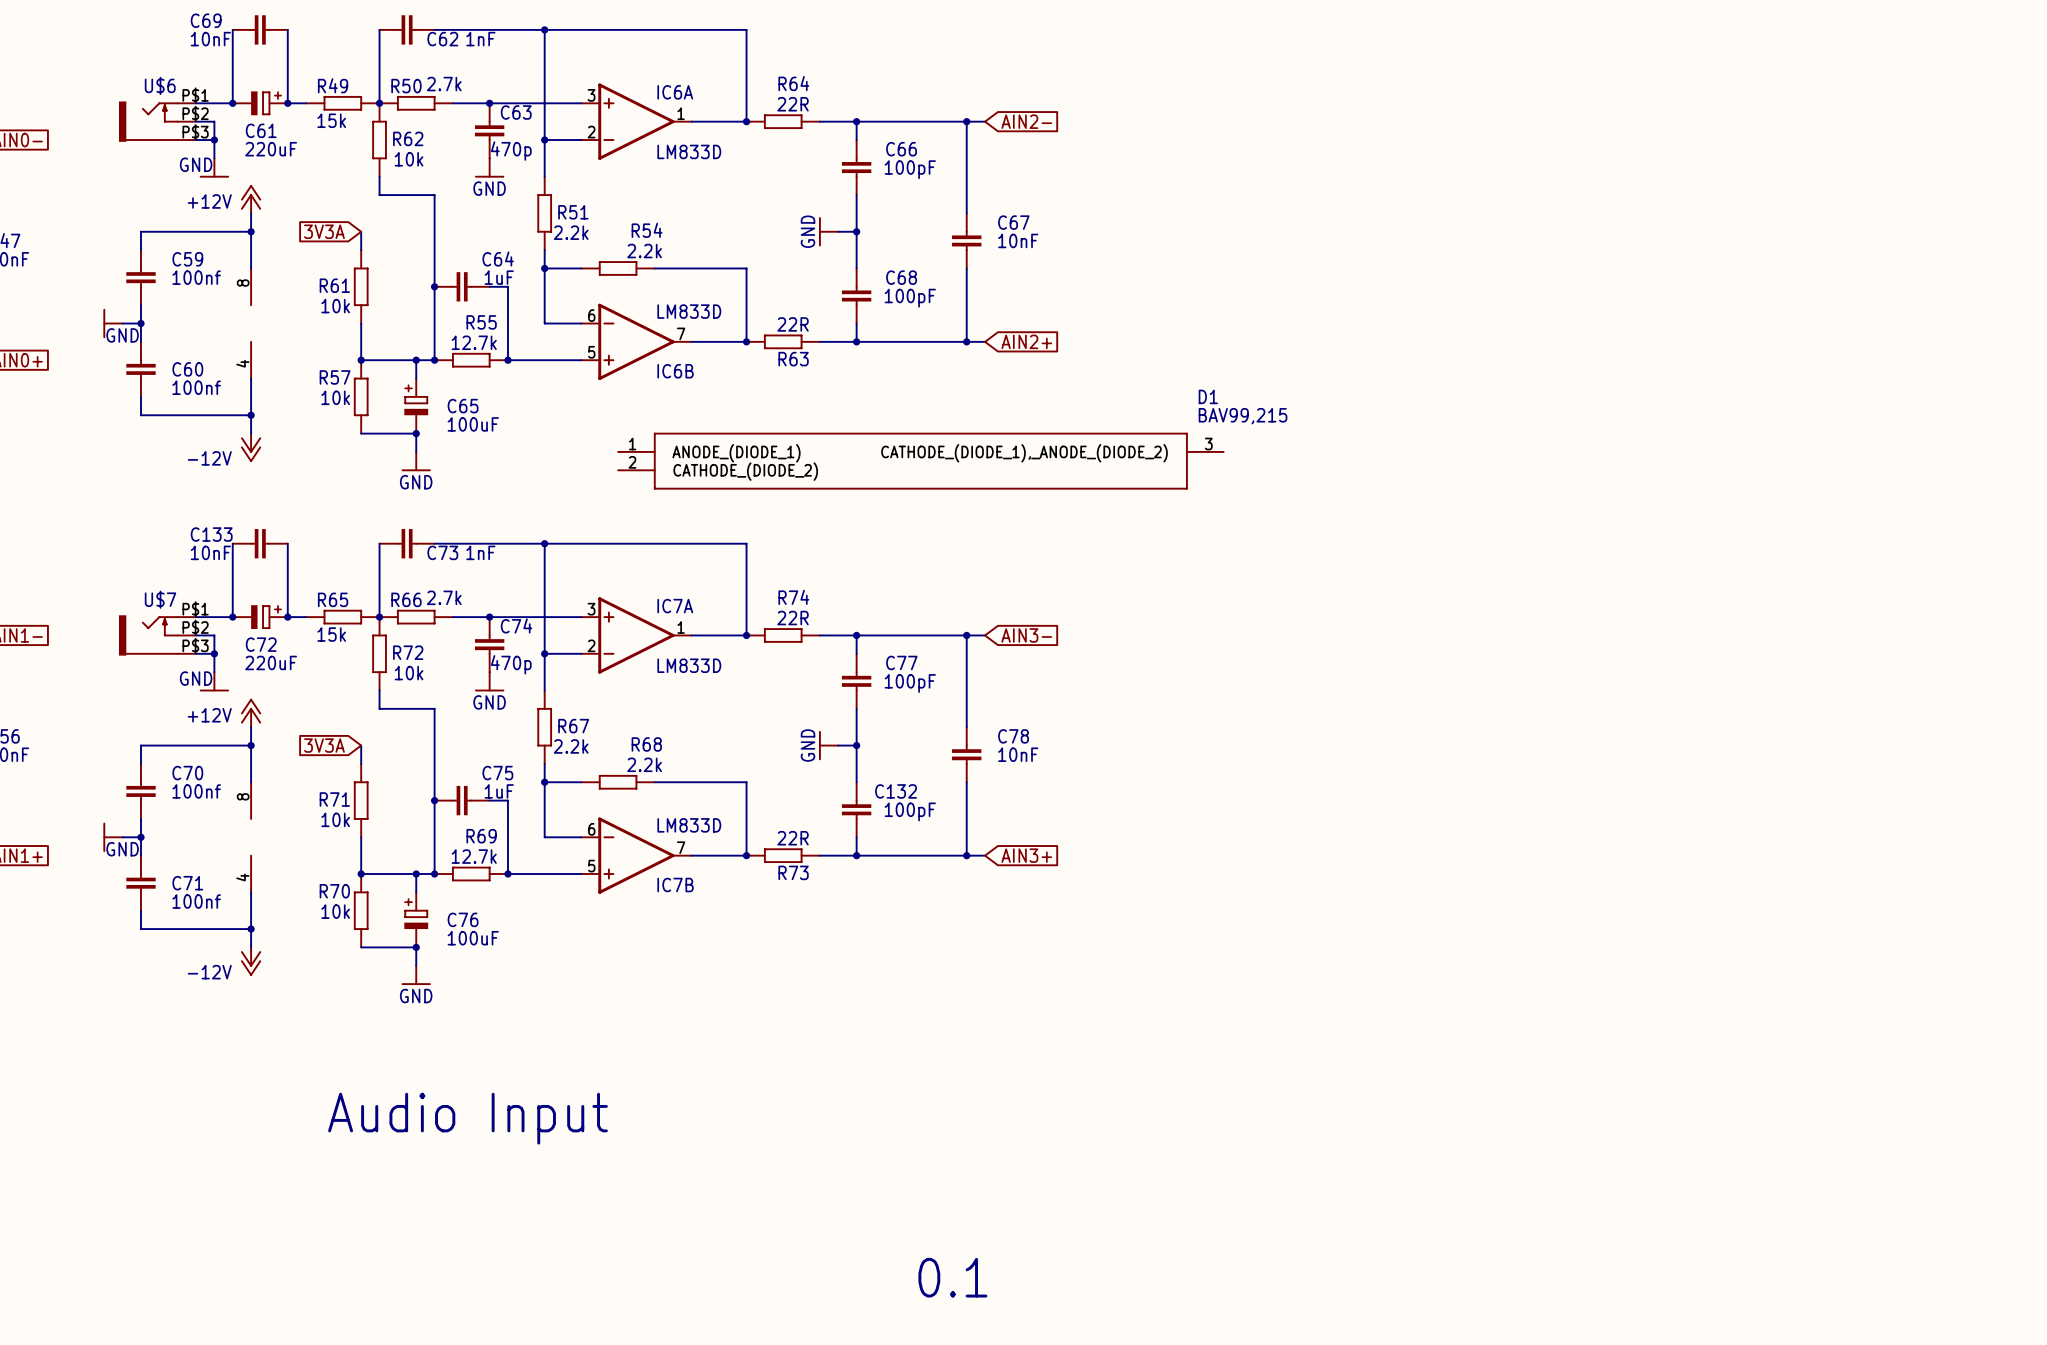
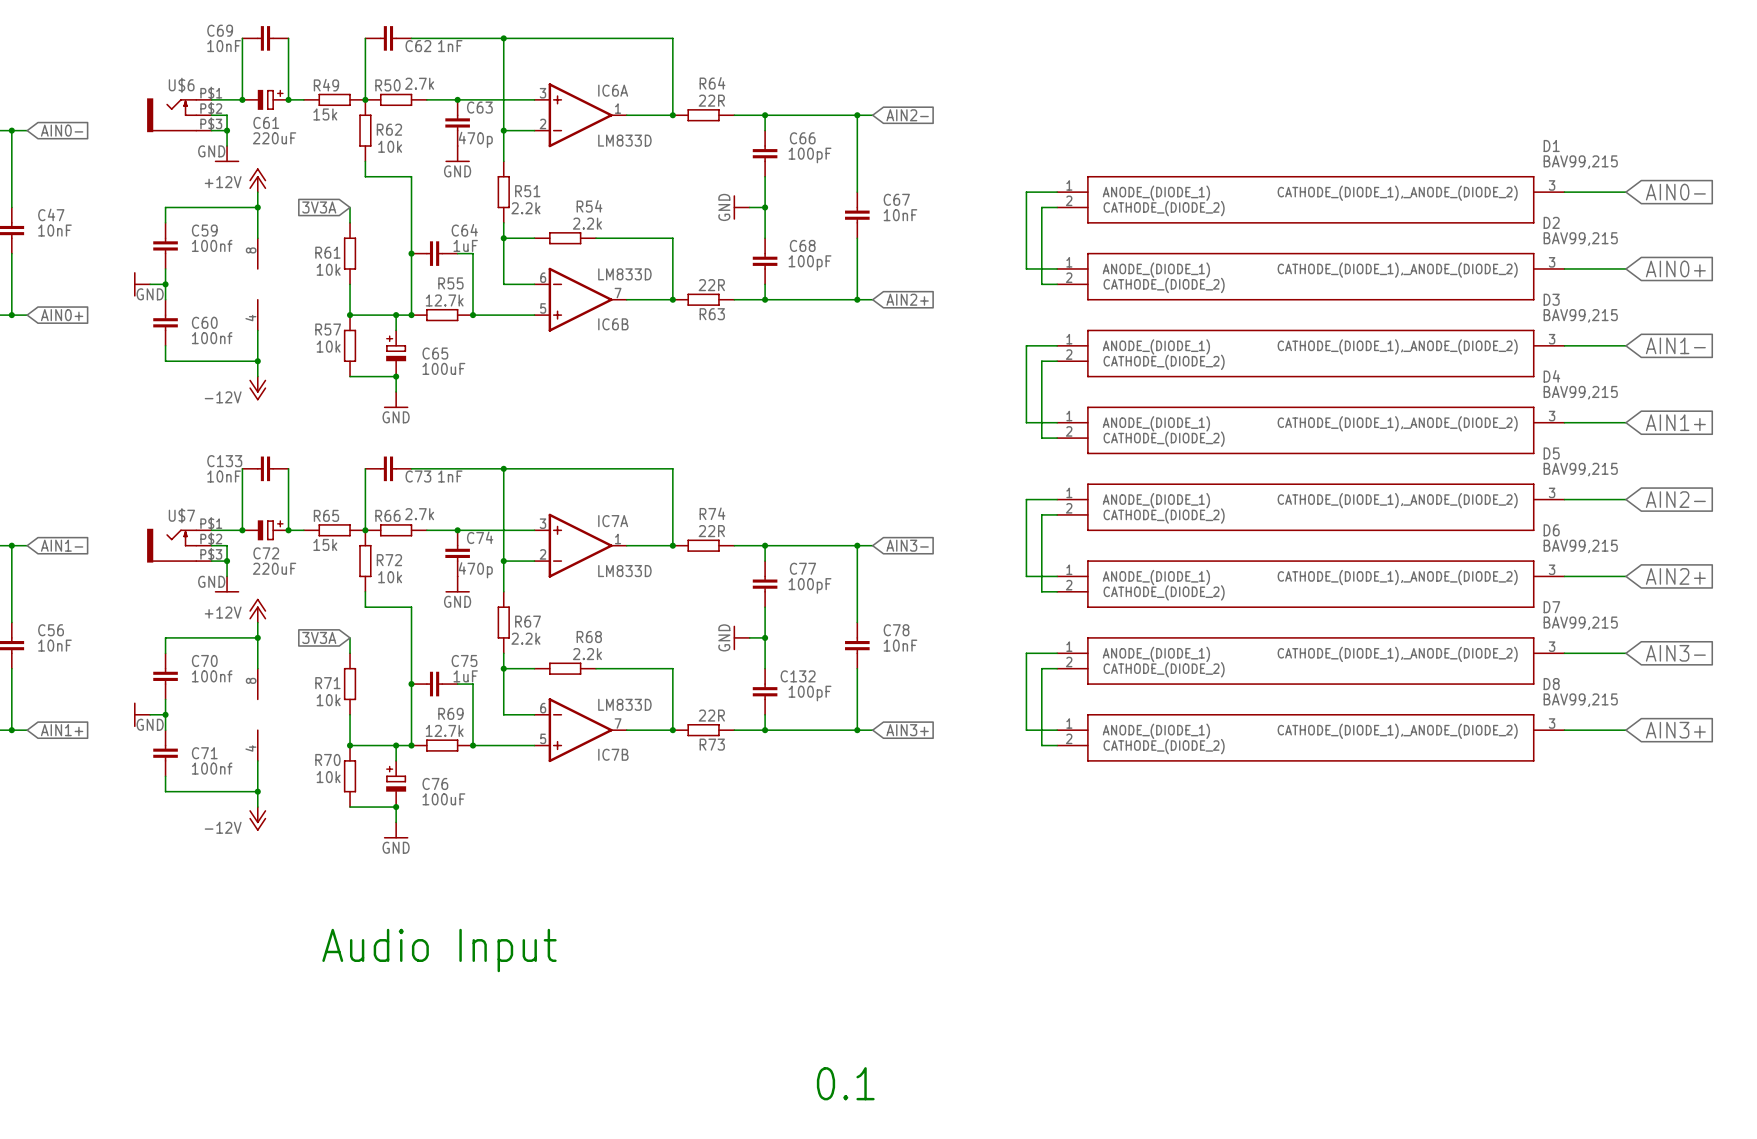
wire: none -> (1057, 192) (1026, 192) (1026, 268) (1057, 268)
wire: none -> (1564, 192) (1625, 192)
global label: none -> AIN0- (1675, 192)
wire: none -> (1057, 207) (1041, 207) (1041, 284) (1057, 284)
wire: none -> (1564, 268) (1625, 268)
global label: none -> AIN0+ (1675, 268)
D2: none -> BAV99,215 (1310, 276)
wire: none -> (1057, 345) (1026, 345) (1026, 422) (1057, 422)
wire: none -> (1564, 345) (1625, 345)
global label: none -> AIN1- (1675, 345)
D3: none -> BAV99,215 (1310, 353)
wire: none -> (1057, 361) (1041, 361) (1041, 438) (1057, 438)
D1 position: (920, 461) -> (1310, 199)
wire: none -> (1564, 422) (1625, 422)
global label: none -> AIN1+ (1675, 422)
D4: none -> BAV99,215 (1310, 430)
wire: none -> (1057, 499) (1026, 499) (1026, 576) (1057, 576)
wire: none -> (1564, 499) (1625, 499)
global label: none -> AIN2- (1675, 499)
D5: none -> BAV99,215 (1310, 507)
wire: none -> (1057, 514) (1041, 514) (1041, 591) (1057, 591)
wire: none -> (1564, 576) (1625, 576)
global label: none -> AIN2+ (1675, 576)
D6: none -> BAV99,215 (1310, 584)
wire: none -> (1057, 653) (1026, 653) (1026, 730) (1057, 730)
wire: none -> (1564, 653) (1625, 653)
global label: none -> AIN3- (1675, 653)
D7: none -> BAV99,215 (1310, 660)
wire: none -> (1057, 668) (1041, 668) (1041, 745) (1057, 745)
wire: none -> (1564, 730) (1625, 730)
global label: none -> AIN3+ (1675, 730)
D8: none -> BAV99,215 (1310, 737)

